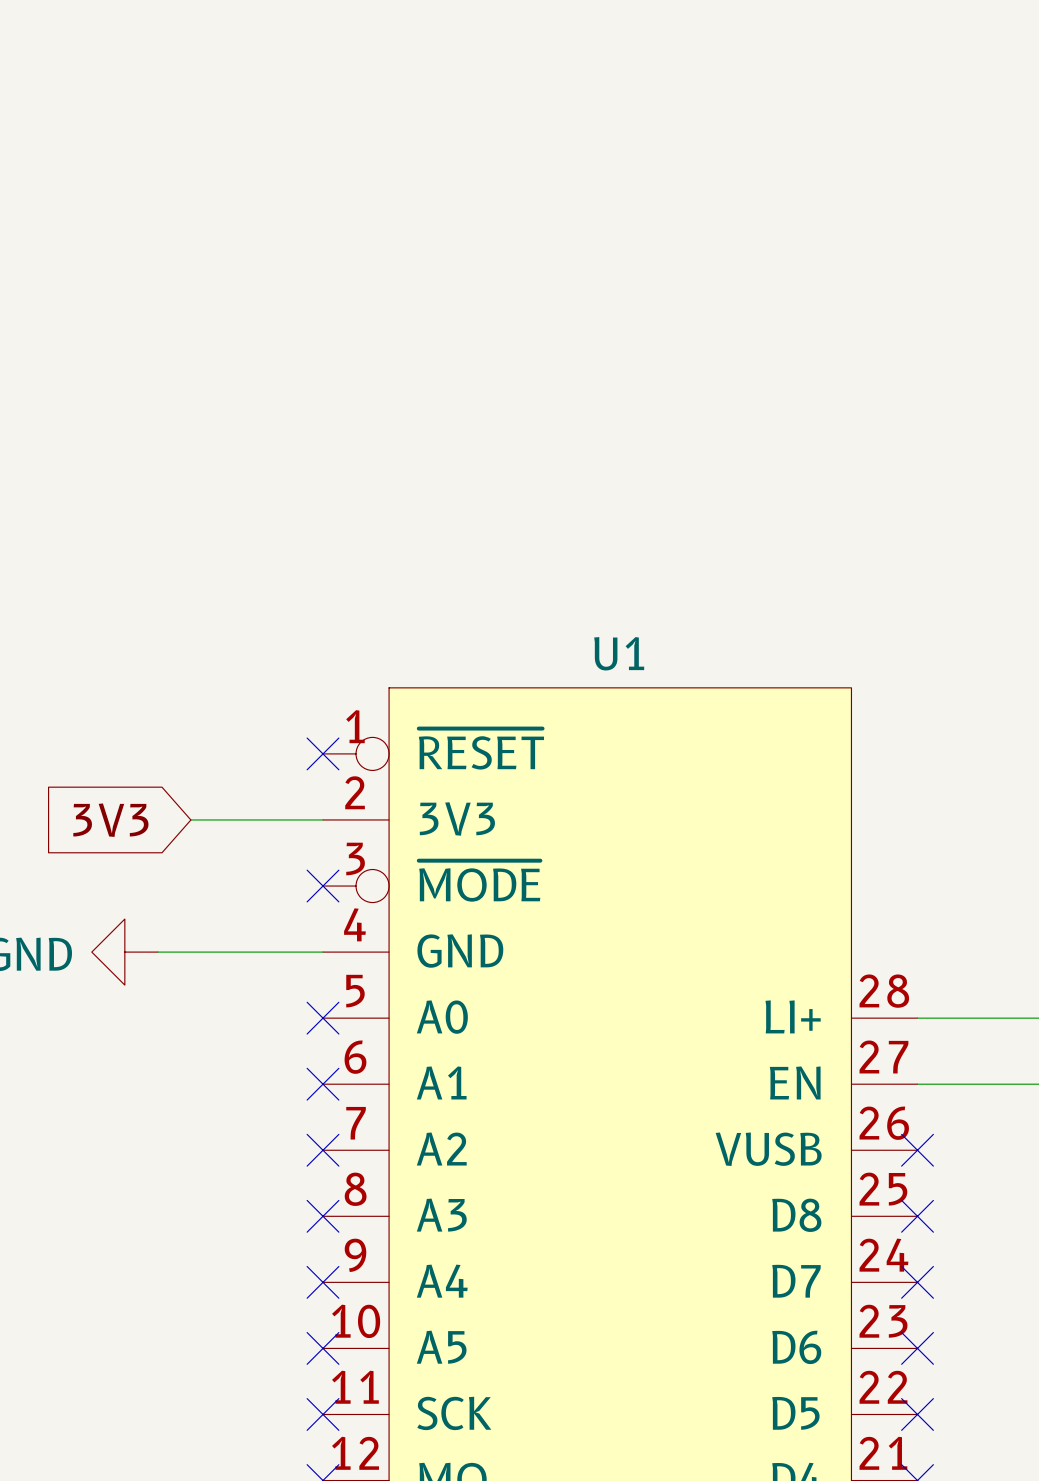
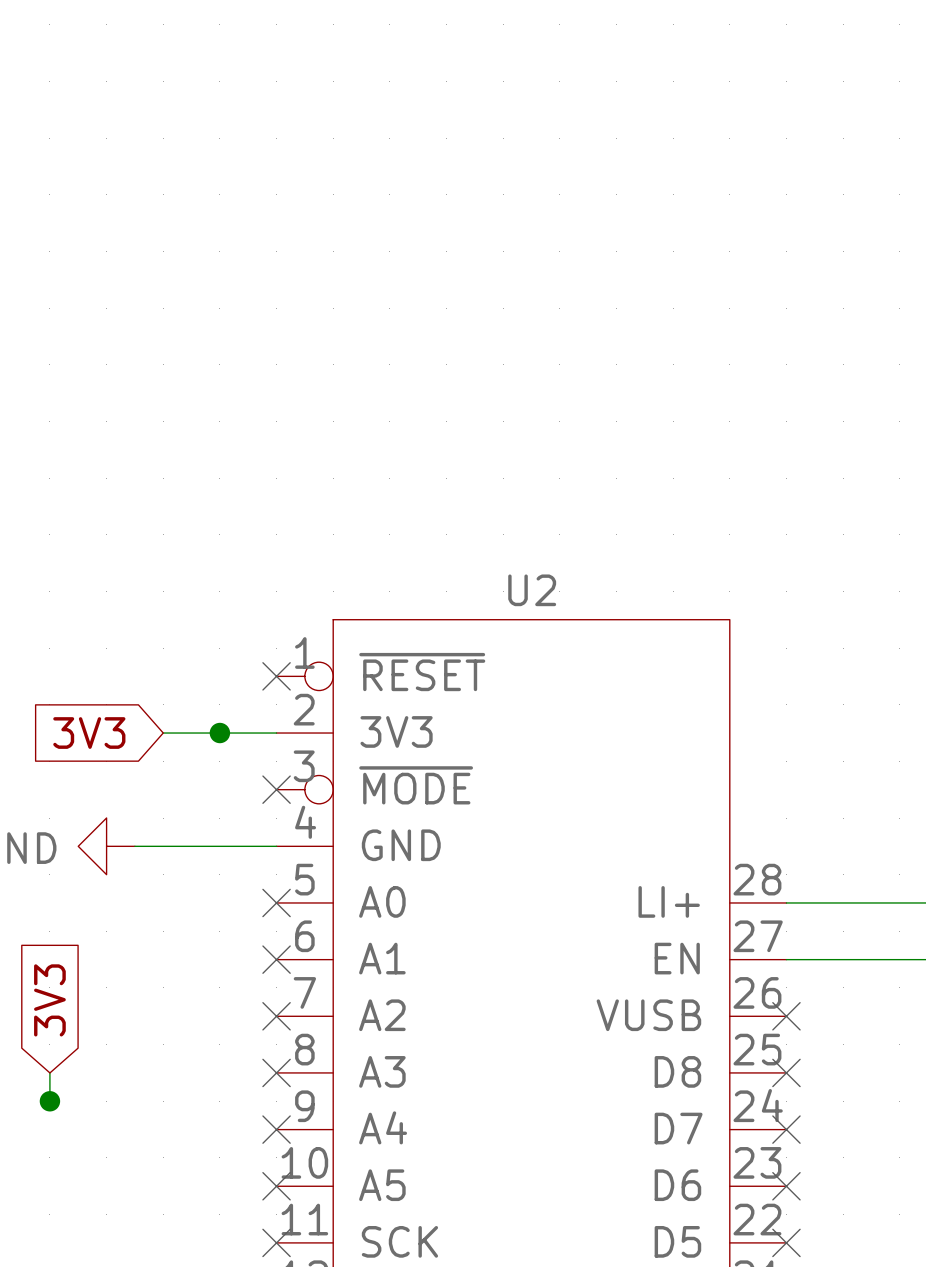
U1 name: U1 (619, 653) -> U2 (532, 590)
junction: none -> (219, 733)
global label: none -> 3V3 (49, 1000)
wire: none -> (49, 1072) (49, 1101)
junction: none -> (49, 1101)

